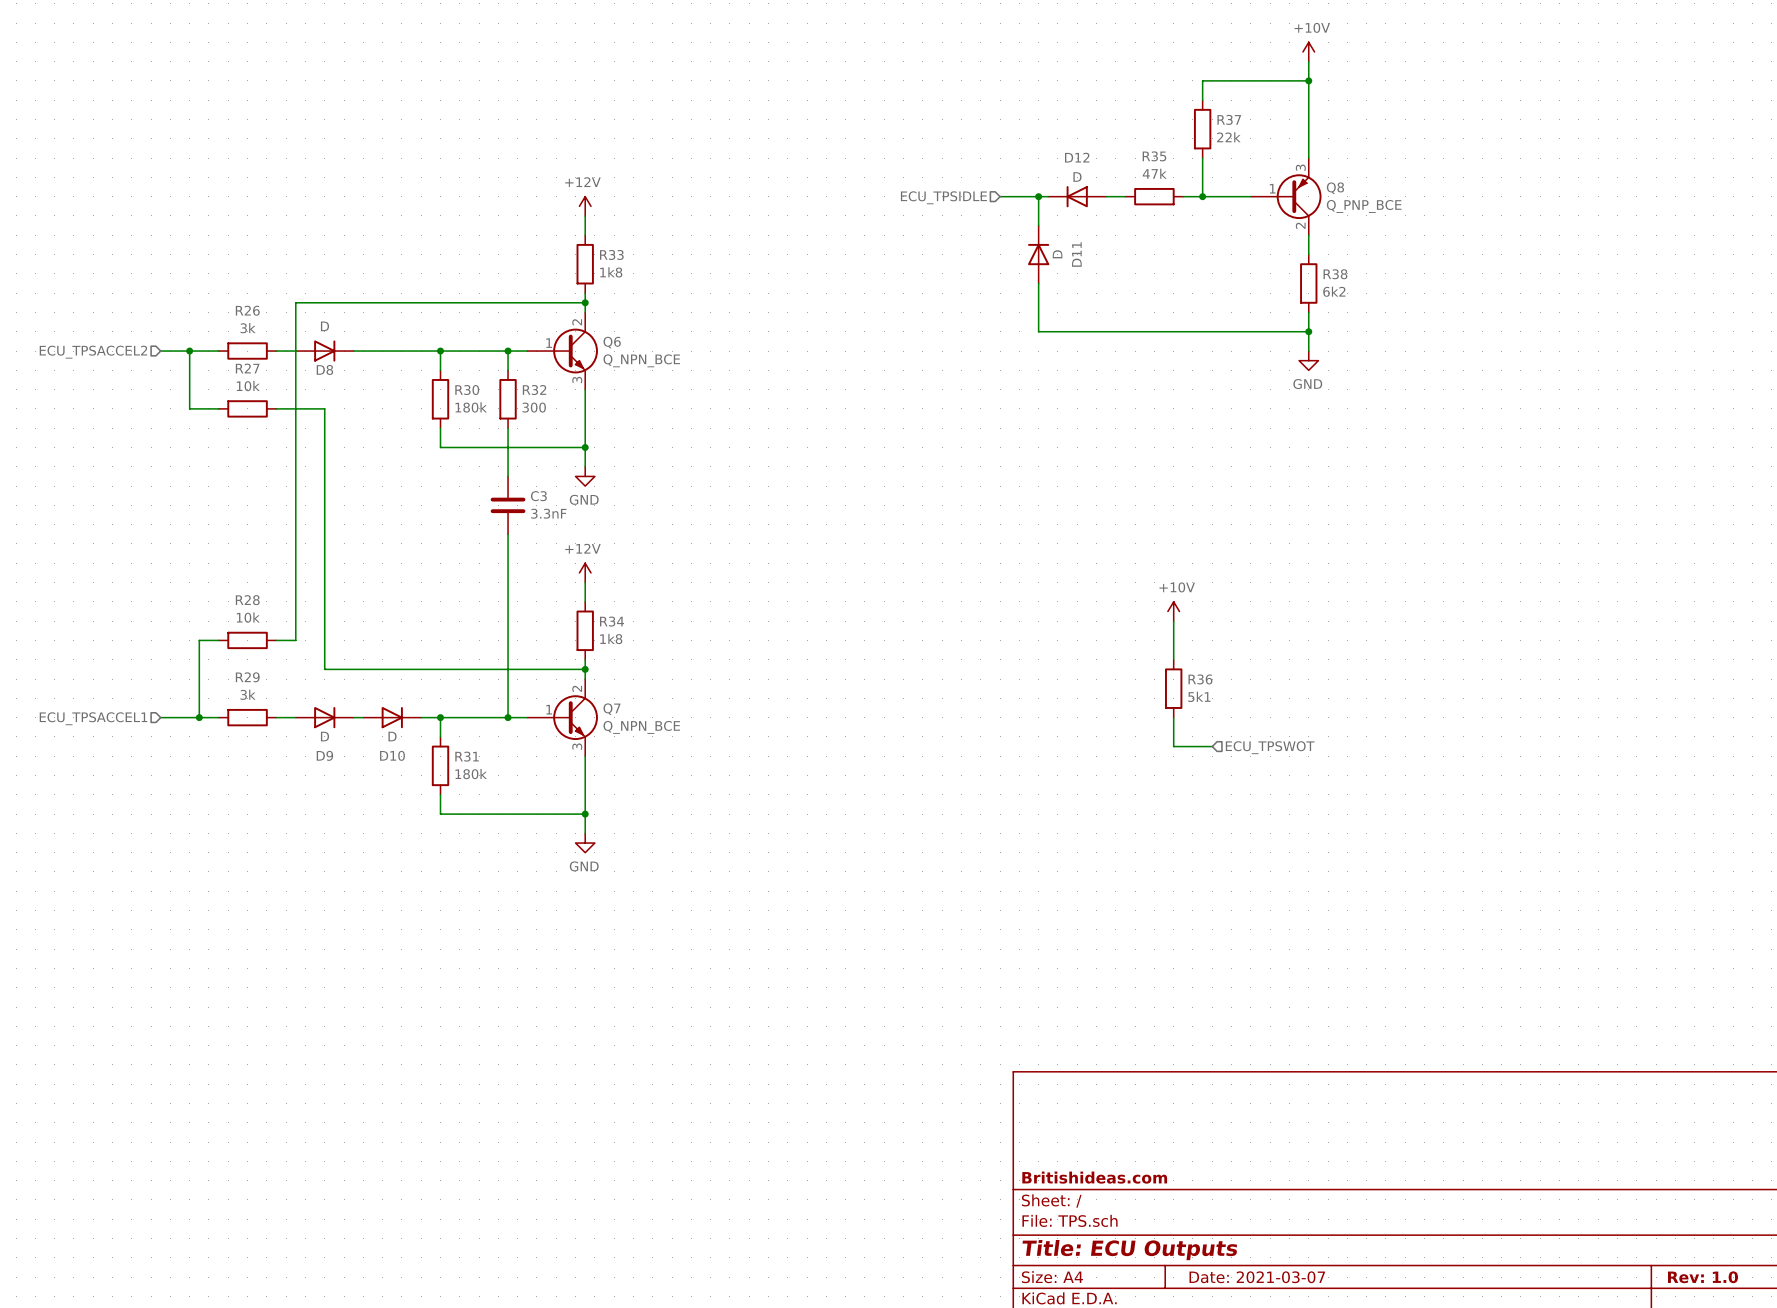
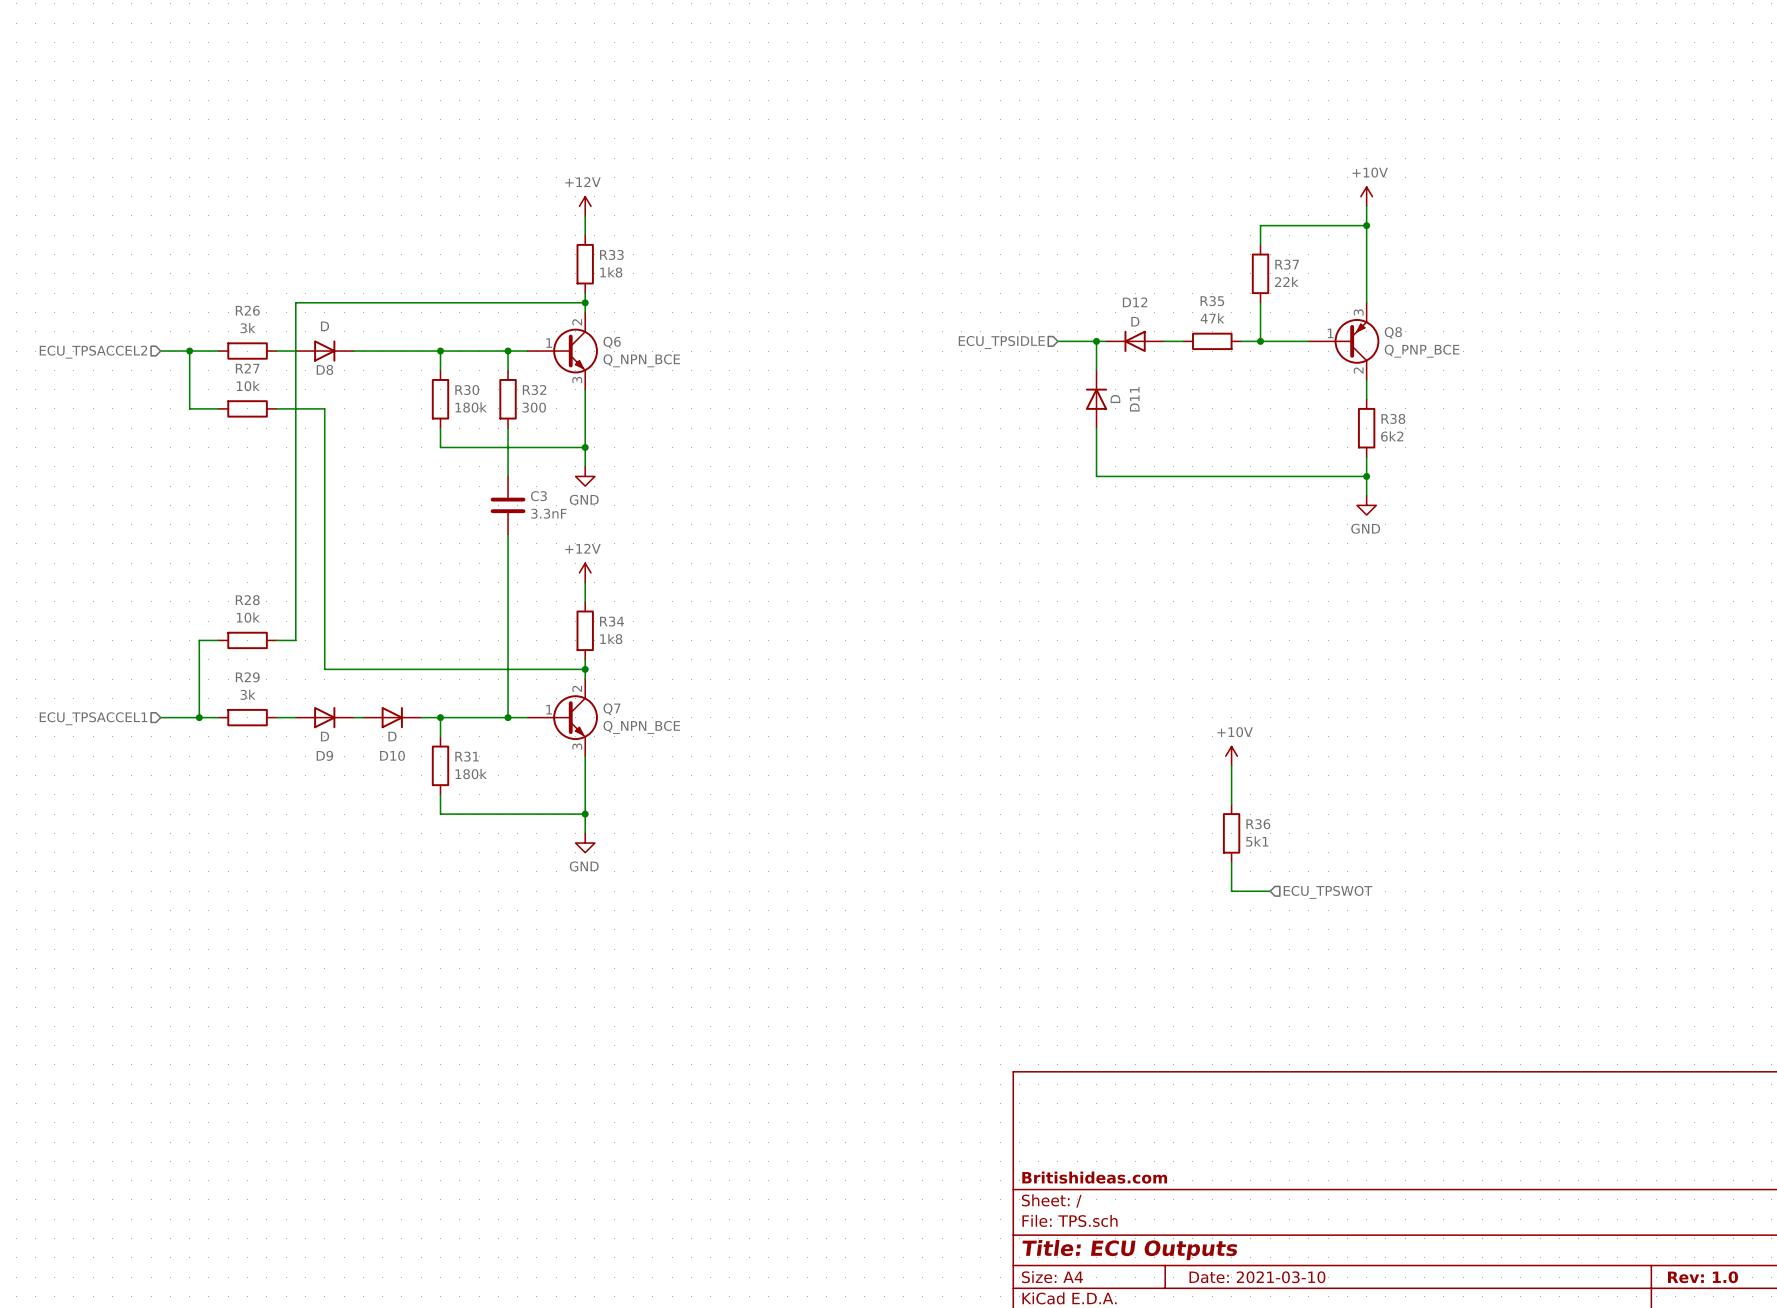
power symbol position: +10V (1308, 51) -> +10V (1366, 196)
wire: (1308, 61) (1308, 158) -> (1366, 206) (1366, 302)
wire: (1308, 80) (1202, 80) (1202, 100) -> (1366, 225) (1260, 225) (1260, 244)
junction: (1308, 80) -> none
R37 position: (1202, 129) -> (1260, 273)
wire: (1202, 158) (1202, 196) -> (1260, 302) (1260, 341)
wire: (1000, 196) (1048, 196) -> (1057, 341) (1106, 341)
wire: (1038, 196) (1038, 225) -> (1096, 341) (1096, 370)
junction: (1038, 196) -> none
D12 position: (1077, 196) -> (1135, 341)
wire: (1106, 196) (1125, 196) -> (1164, 341) (1183, 341)
R35 position: (1154, 196) -> (1212, 341)
wire: (1183, 196) (1250, 196) -> (1241, 341) (1308, 341)
junction: (1202, 196) -> none
Q8 position: (1286, 196) -> (1344, 341)
hierarchical label position: ECU_TPSIDLE (943, 197) -> ECU_TPSIDLE (1001, 342)
junction: none -> (1366, 225)
wire: (1308, 235) (1308, 254) -> (1366, 379) (1366, 399)
D11 position: (1038, 254) -> (1096, 399)
wire: (1038, 283) (1038, 331) (1308, 331) -> (1096, 428) (1096, 476) (1366, 476)
R38 position: (1308, 283) -> (1366, 428)
wire: (1308, 312) (1308, 351) -> (1366, 457) (1366, 495)
junction: (1308, 331) -> none
junction: none -> (1096, 341)
junction: none -> (1260, 341)
power symbol position: GND (1308, 360) -> GND (1366, 505)
junction: none -> (1366, 476)
power symbol position: +10V (1173, 611) -> +10V (1231, 756)
wire: (1173, 621) (1173, 659) -> (1231, 765) (1231, 804)
R36 position: (1173, 688) -> (1231, 833)
wire: (1173, 717) (1173, 746) (1212, 746) -> (1231, 862) (1231, 891) (1270, 891)
hierarchical label position: ECU_TPSWOT (1270, 747) -> ECU_TPSWOT (1328, 892)
title block: Date: 2021-03-07 (1257, 1277) -> Date: 2021-03-10 (1257, 1277)

